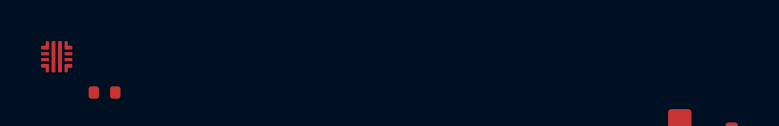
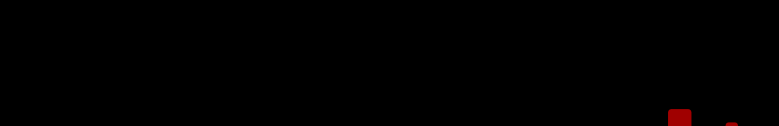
part: (56, 56) -> none
part: (104, 92) -> none

